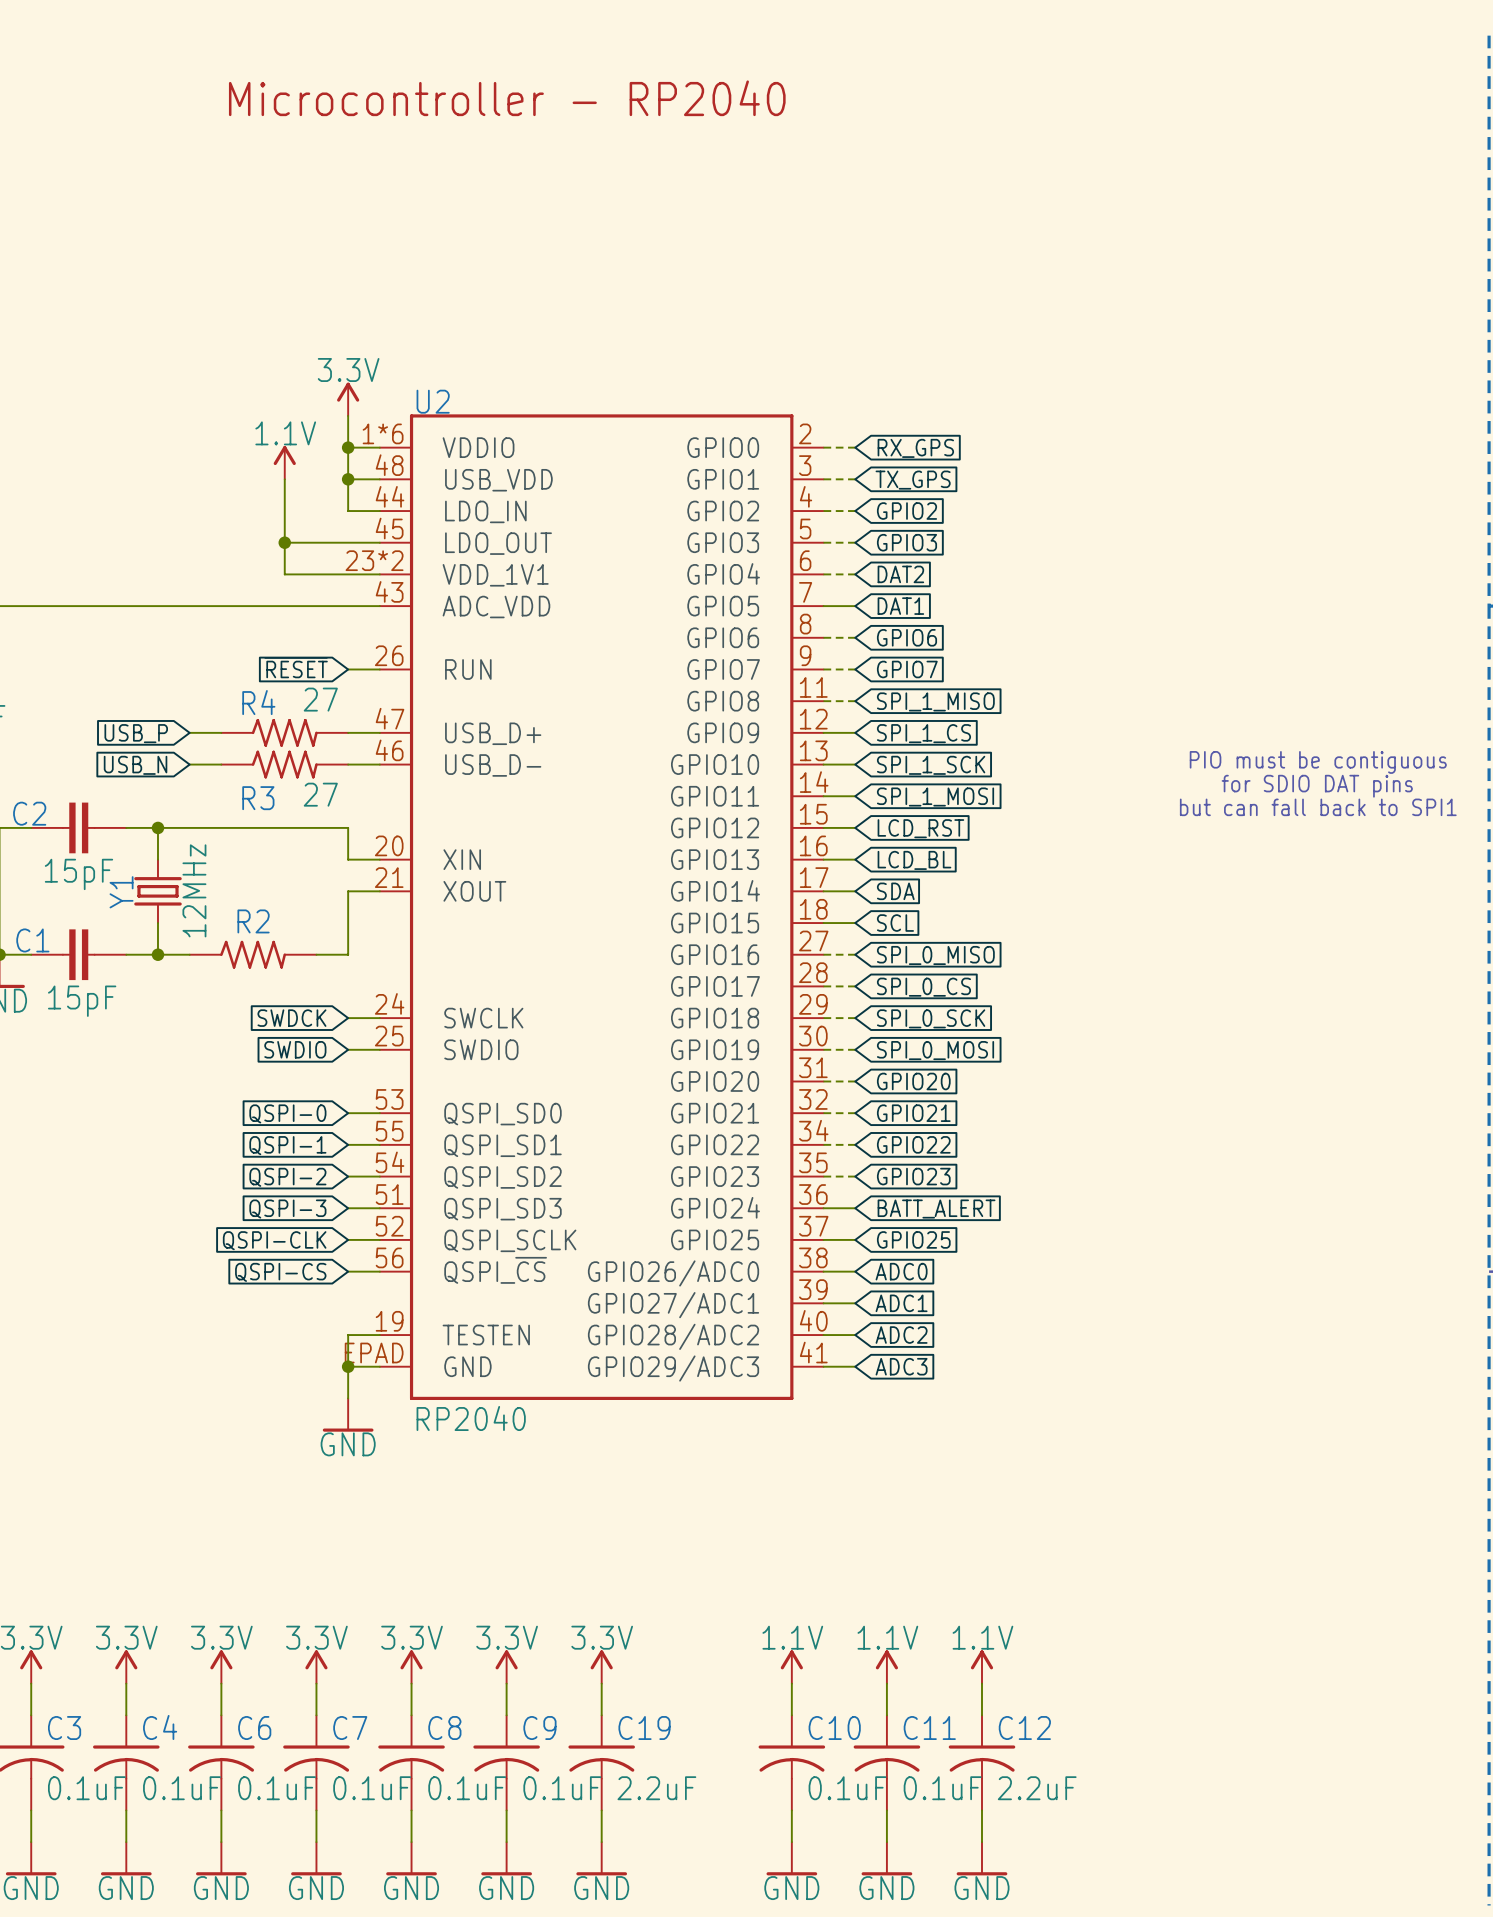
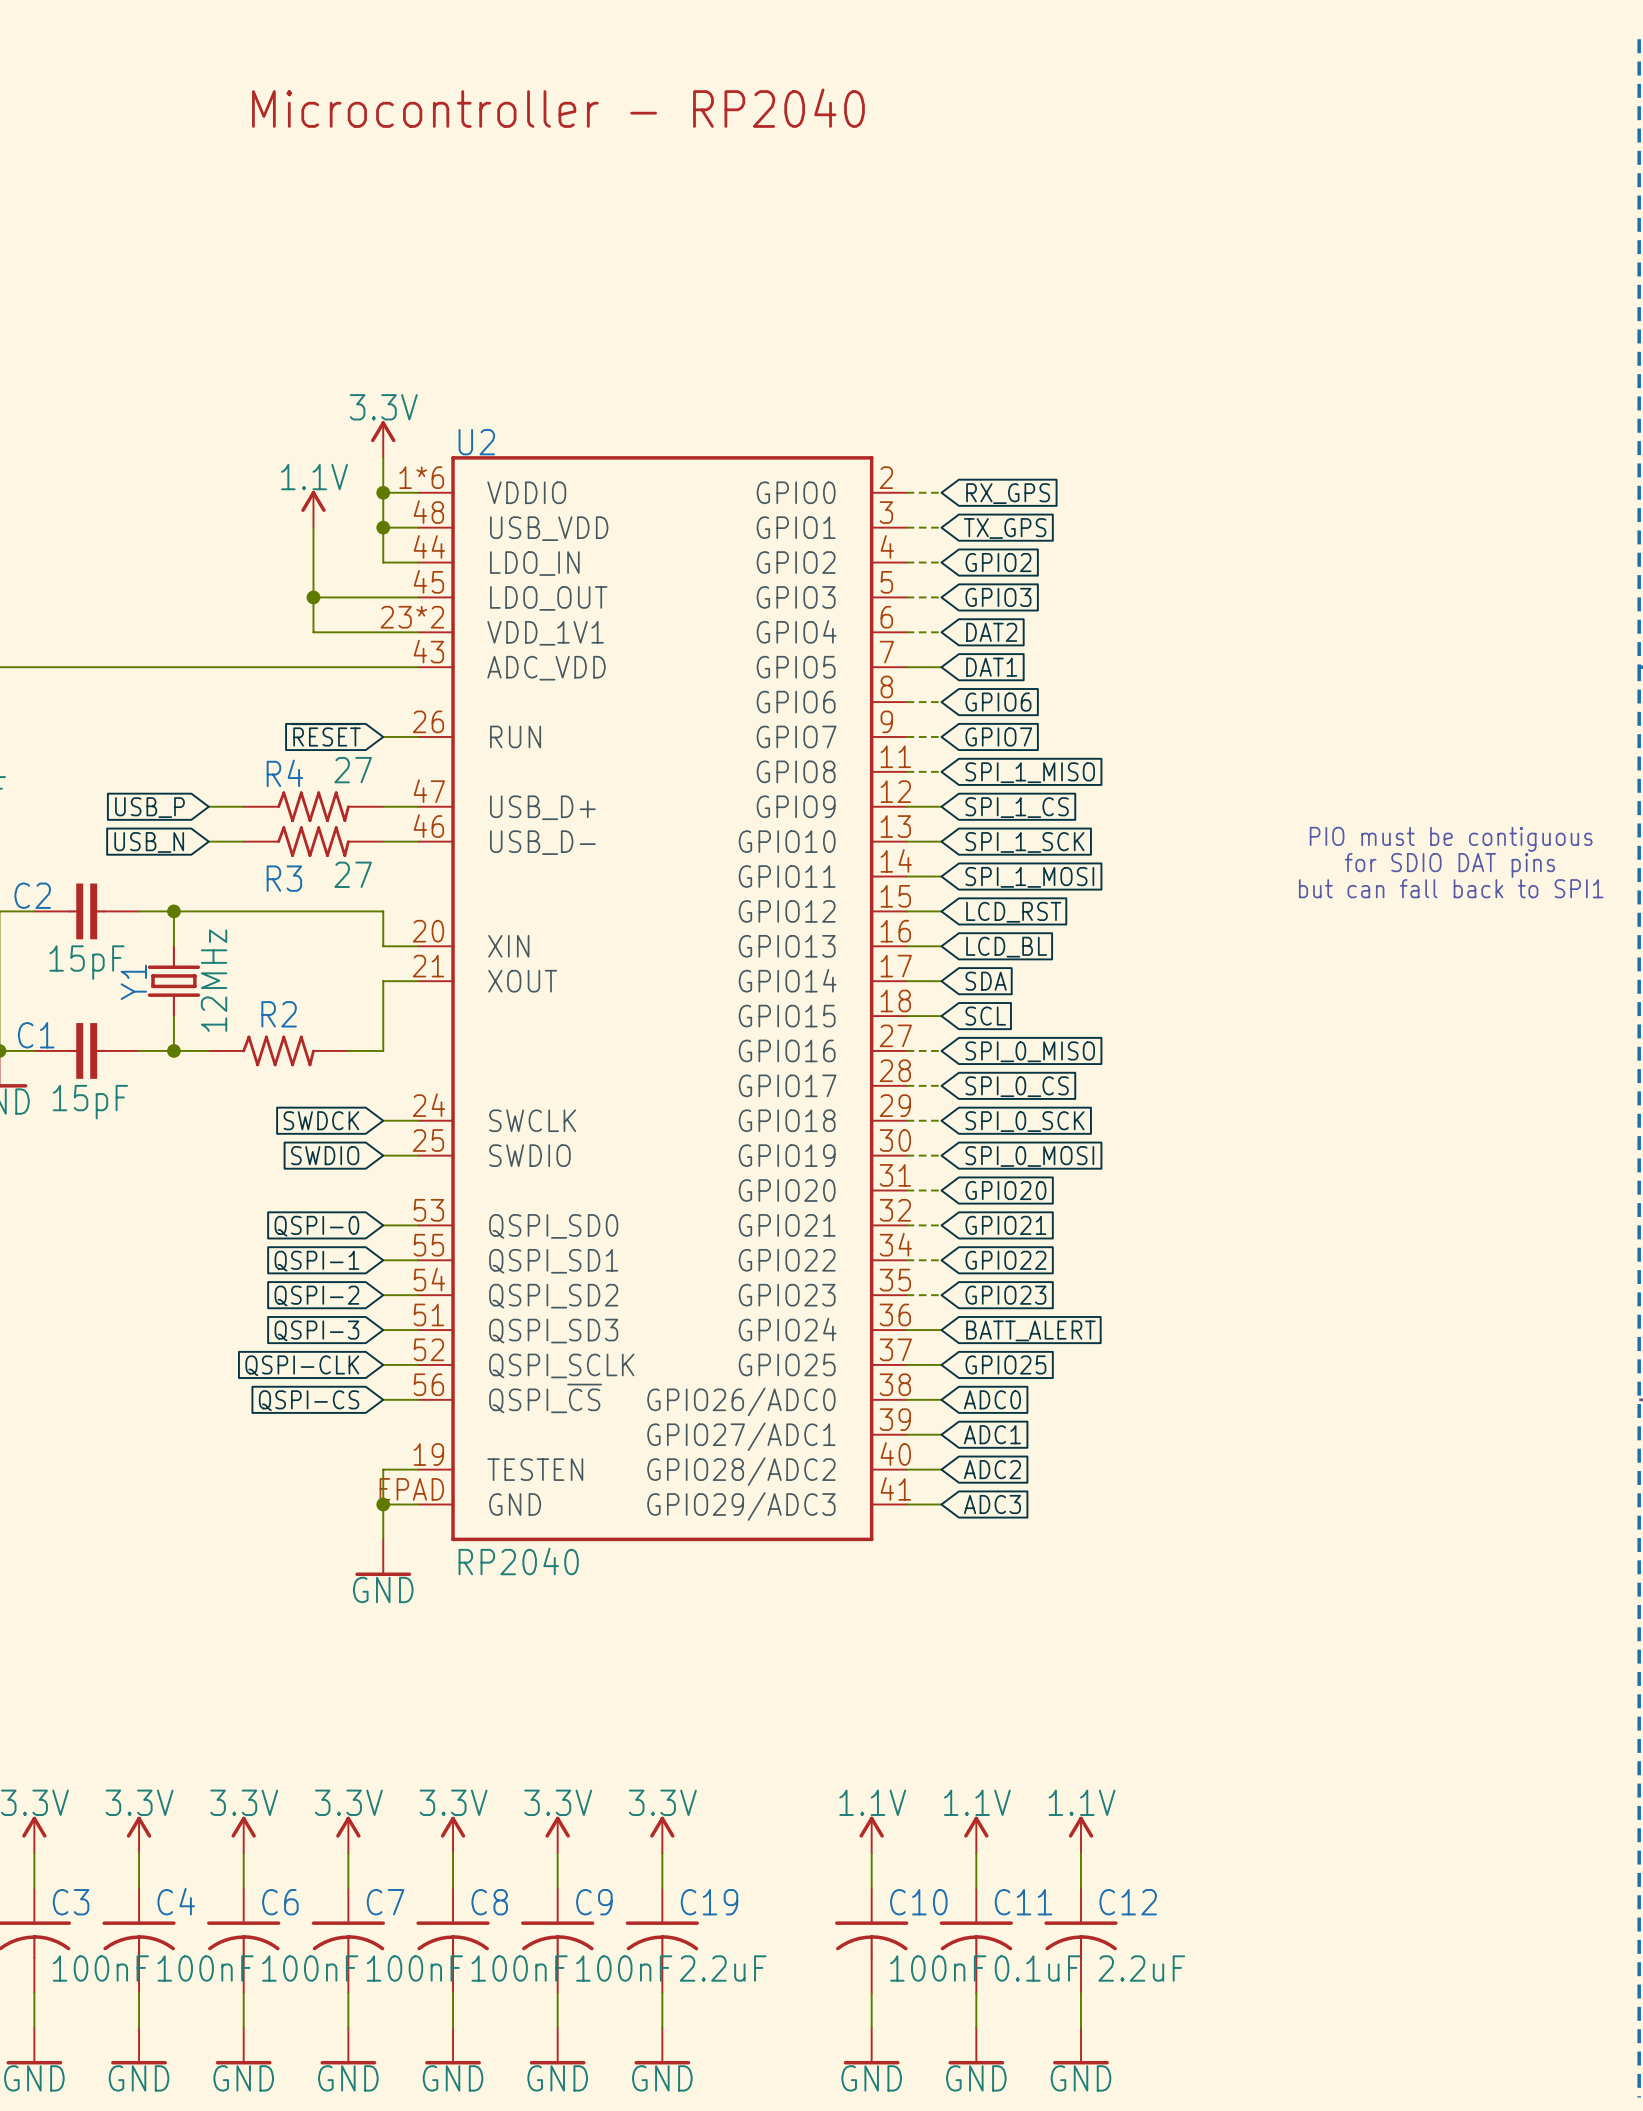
C3 value: 0.1uF (86, 1788) -> 100nF (100, 1968)
C4 value: 0.1uF (181, 1788) -> 100nF (205, 1968)
C6 value: 0.1uF (277, 1788) -> 100nF (310, 1968)
C7 value: 0.1uF (372, 1788) -> 100nF (414, 1968)
C8 value: 0.1uF (467, 1788) -> 100nF (519, 1968)
C9 value: 0.1uF (562, 1788) -> 100nF (624, 1968)
C10 value: 0.1uF (847, 1788) -> 100nF (938, 1968)

